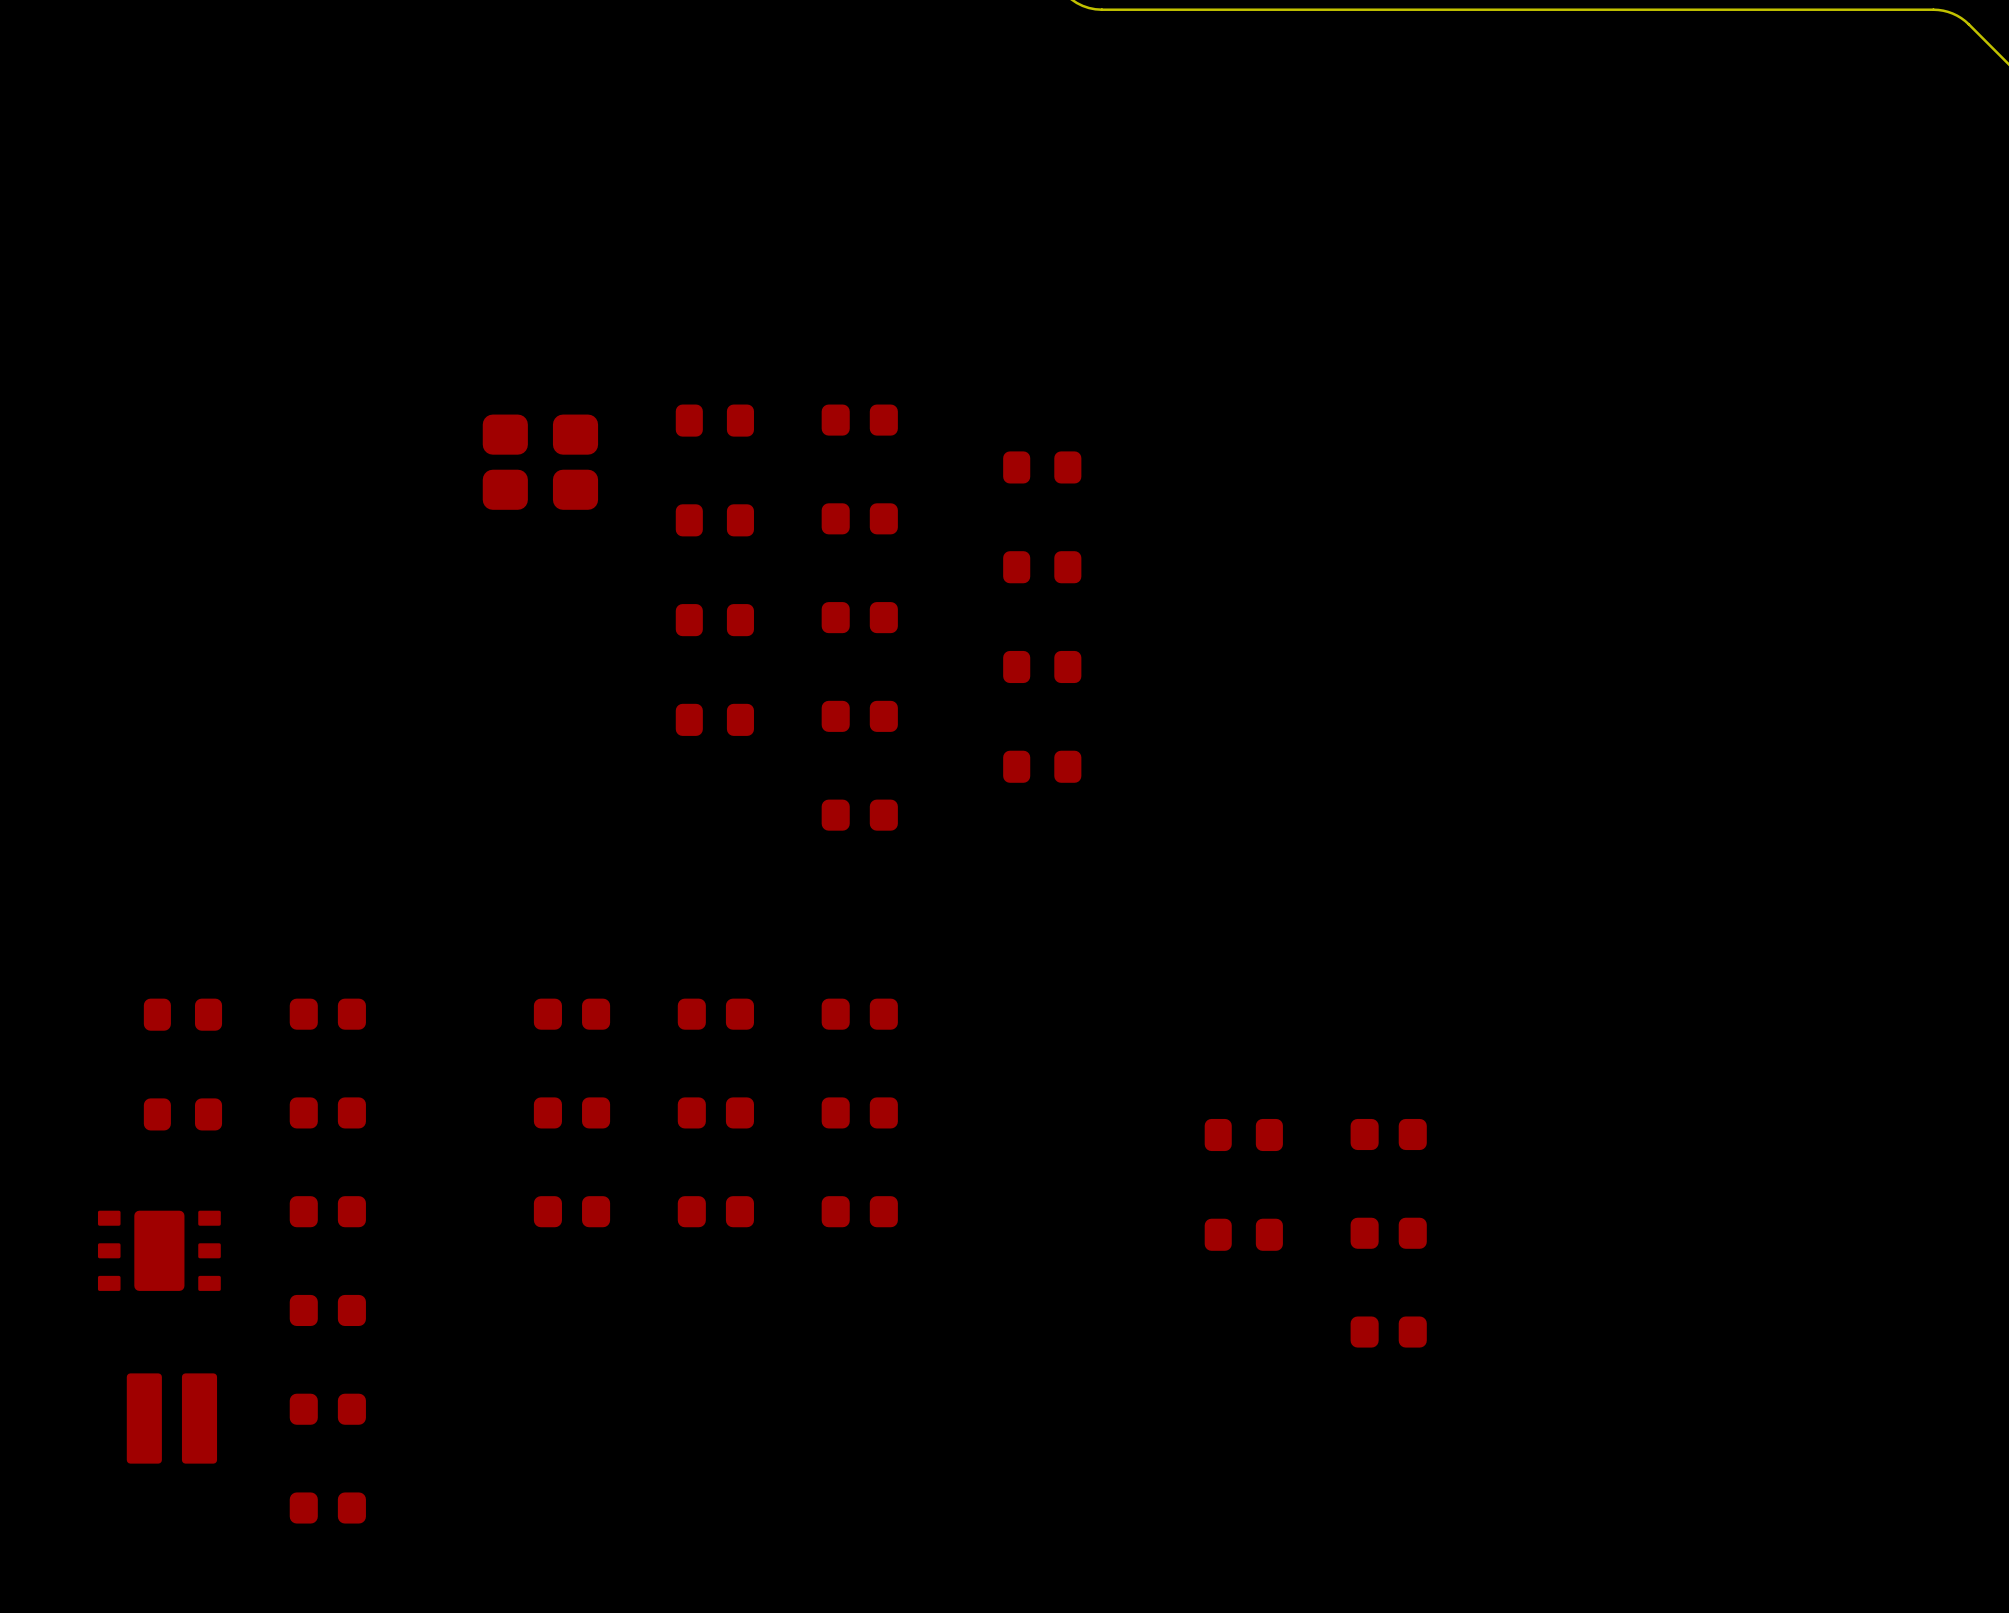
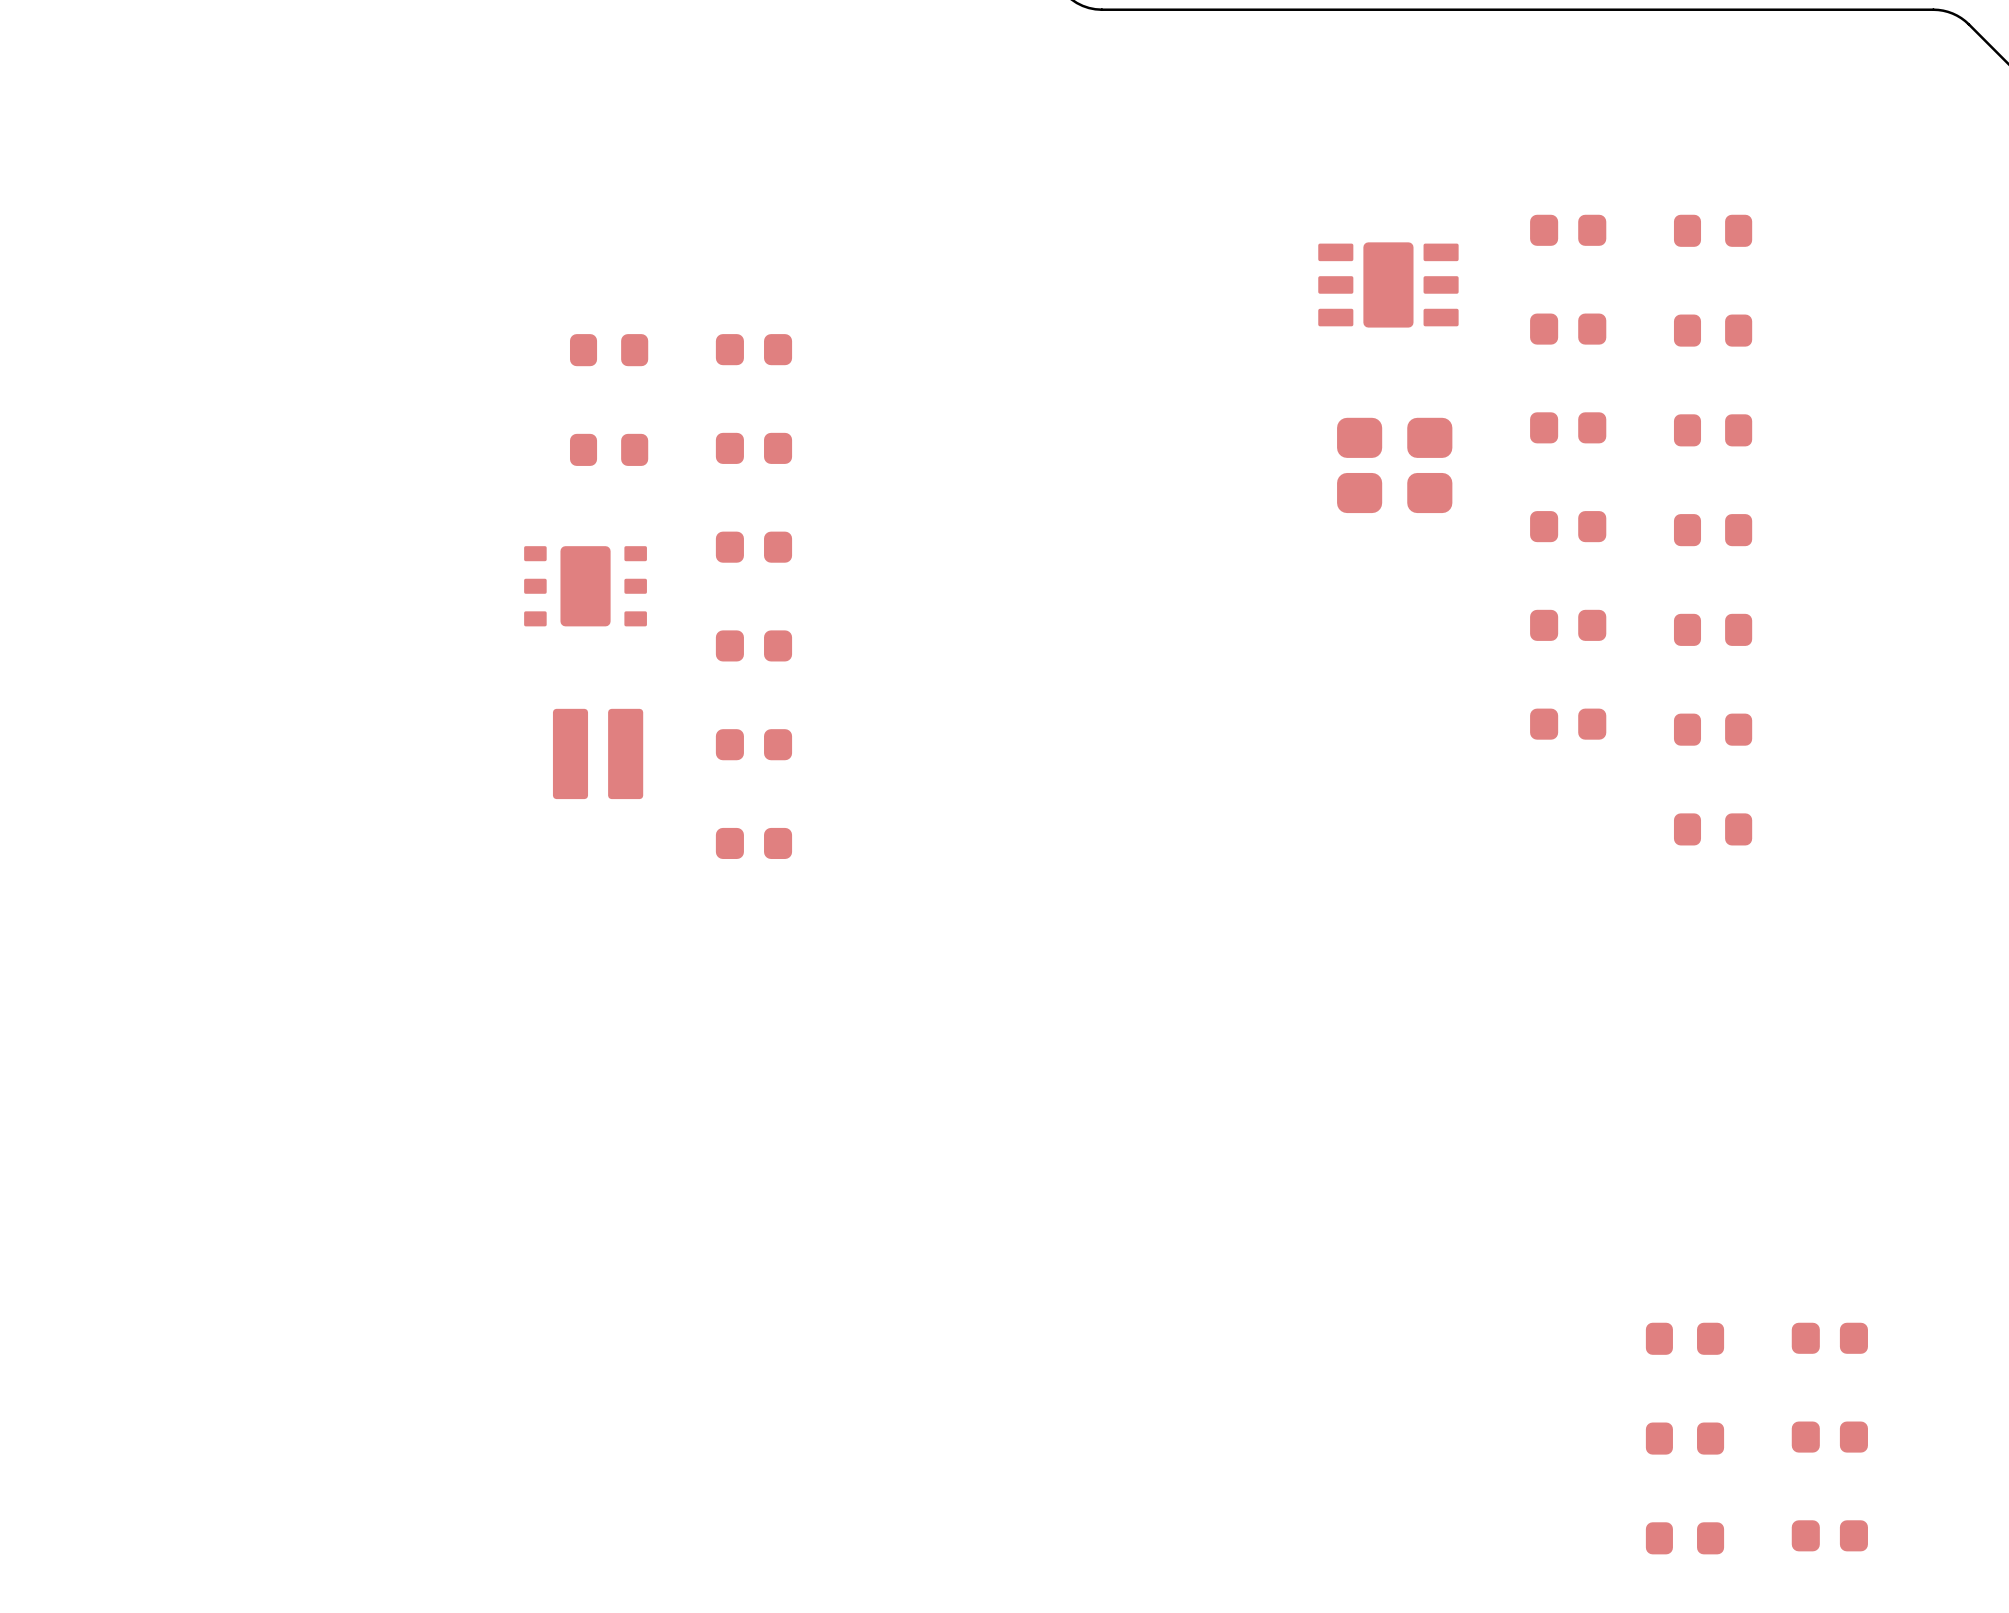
part: none -> (1568, 230)
part: none -> (1713, 230)
part: none -> (1388, 284)
part: none -> (1568, 329)
part: none -> (1713, 330)
part: none -> (753, 349)
part: none -> (609, 350)
part: (714, 420) -> none
part: (859, 420) -> none
part: none -> (1568, 427)
part: none -> (1713, 430)
part: none -> (753, 448)
part: none -> (609, 449)
part position: (540, 462) -> (1394, 465)
part: (1042, 467) -> none
part: (859, 518) -> none
part: (714, 520) -> none
part: none -> (1568, 526)
part: none -> (1713, 530)
part: none -> (753, 547)
part: (1042, 567) -> none
part: (859, 617) -> none
part: (714, 620) -> none
part: none -> (1568, 625)
part: none -> (1713, 629)
part: none -> (753, 645)
part: (1042, 666) -> none
part: (859, 716) -> none
part: (714, 719) -> none
part: none -> (1568, 724)
part: none -> (1713, 729)
part: none -> (753, 744)
part: (1042, 766) -> none
part: (859, 815) -> none
part: none -> (1713, 829)
part: none -> (753, 843)
part: (182, 1014) -> none
part: (327, 1014) -> none
part: (572, 1014) -> none
part: (715, 1014) -> none
part: (859, 1014) -> none
part: (327, 1112) -> none
part: (572, 1112) -> none
part: (715, 1112) -> none
part: (859, 1112) -> none
part: (182, 1114) -> none
part: (1243, 1134) -> none
part: (1388, 1134) -> none
part: (327, 1211) -> none
part: (572, 1211) -> none
part: (715, 1211) -> none
part: (859, 1211) -> none
part: (1388, 1233) -> none
part: (1243, 1234) -> none
part position: (159, 1250) -> (585, 586)
part: (327, 1310) -> none
part: (1388, 1332) -> none
part: none -> (1684, 1338)
part: none -> (1829, 1338)
part: (327, 1409) -> none
part position: (171, 1418) -> (598, 753)
part: none -> (1829, 1437)
part: none -> (1684, 1438)
part: (327, 1507) -> none
part: none -> (1829, 1535)
part: none -> (1684, 1538)

